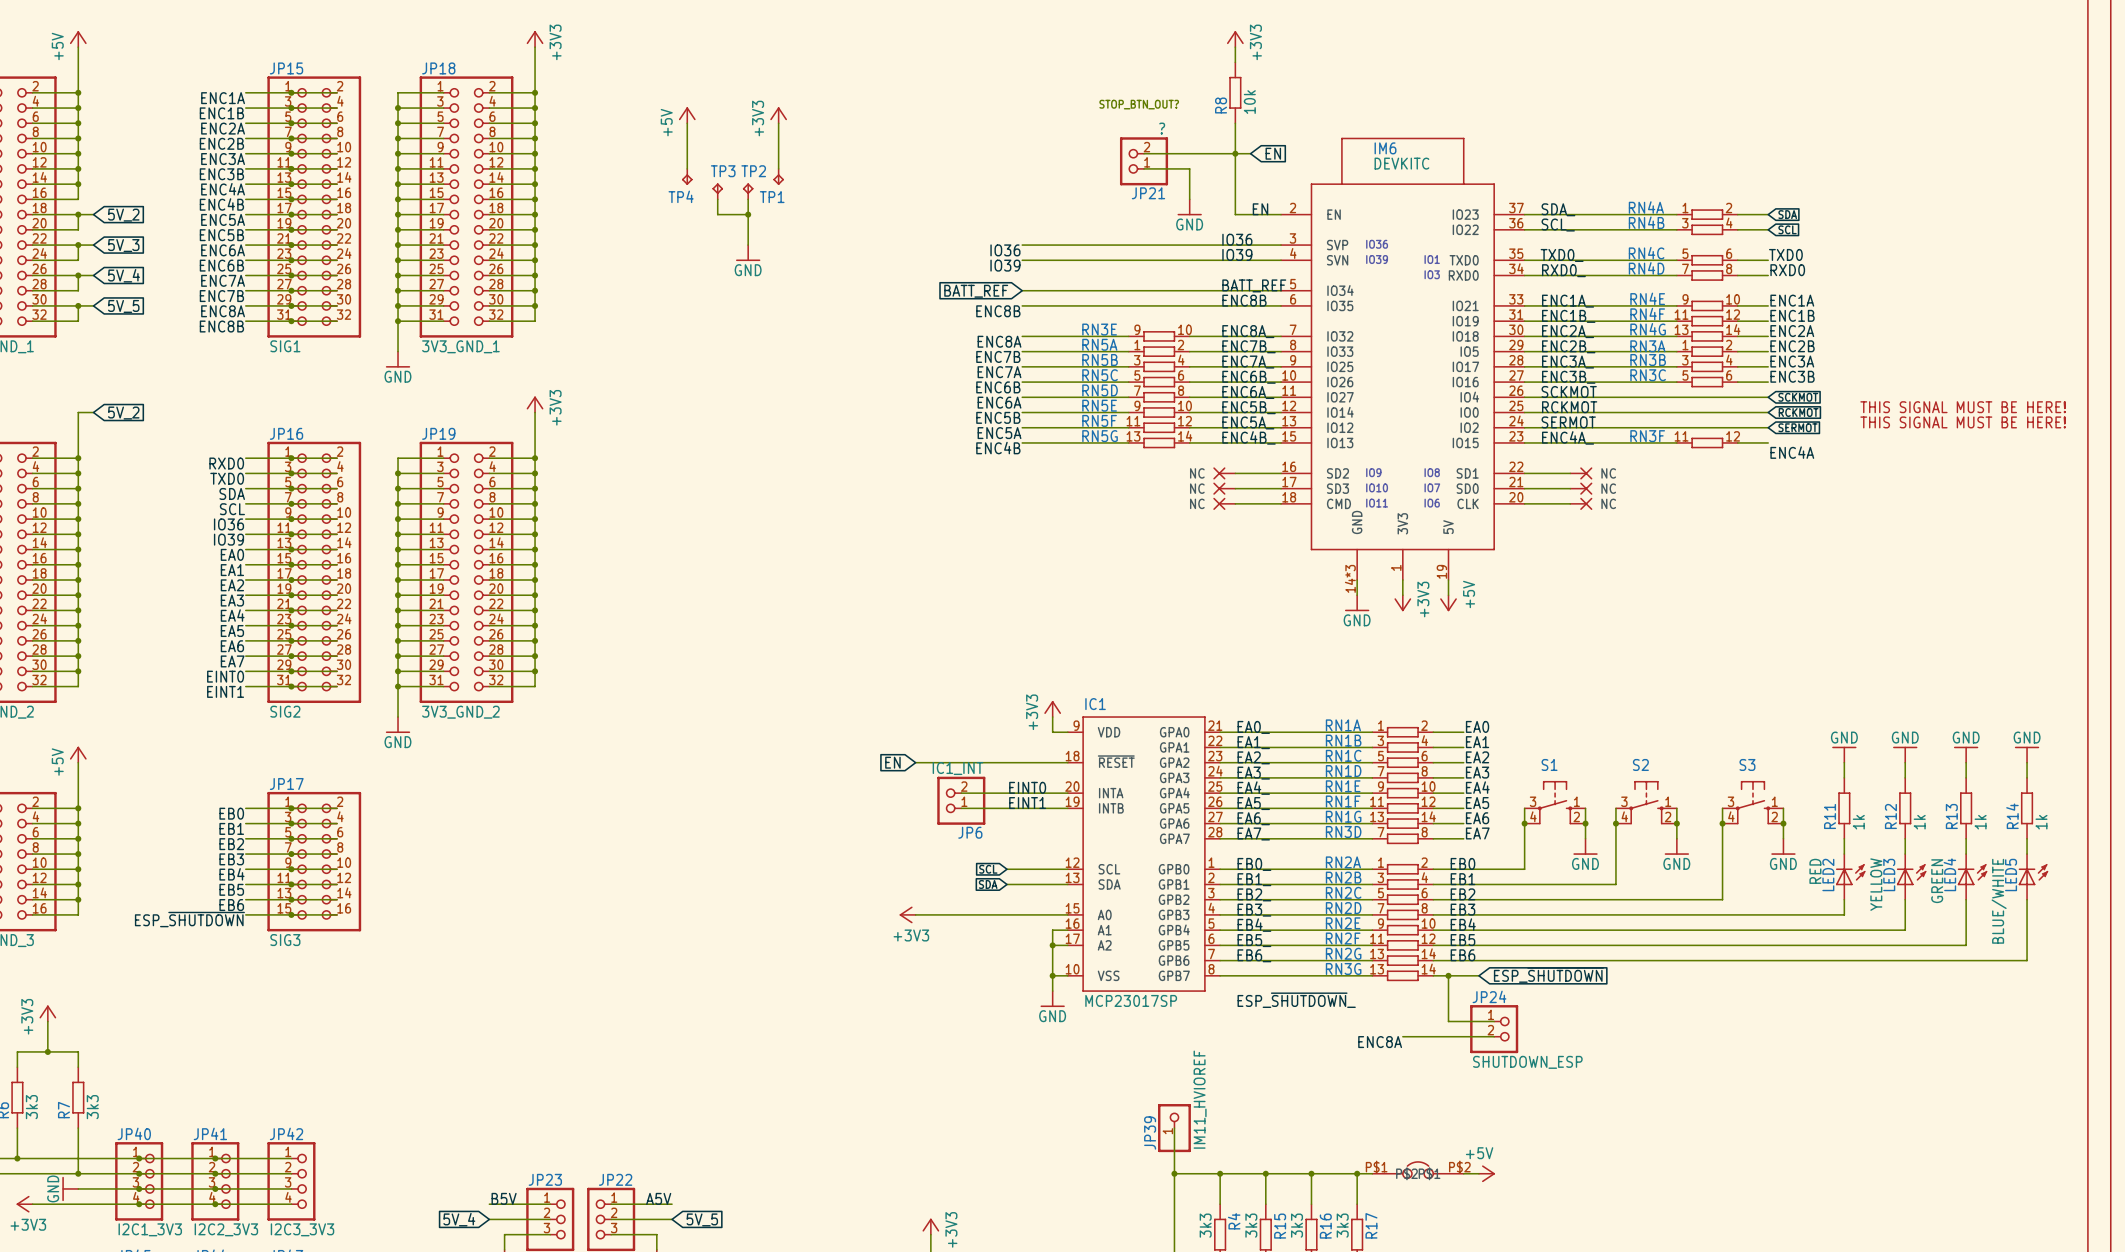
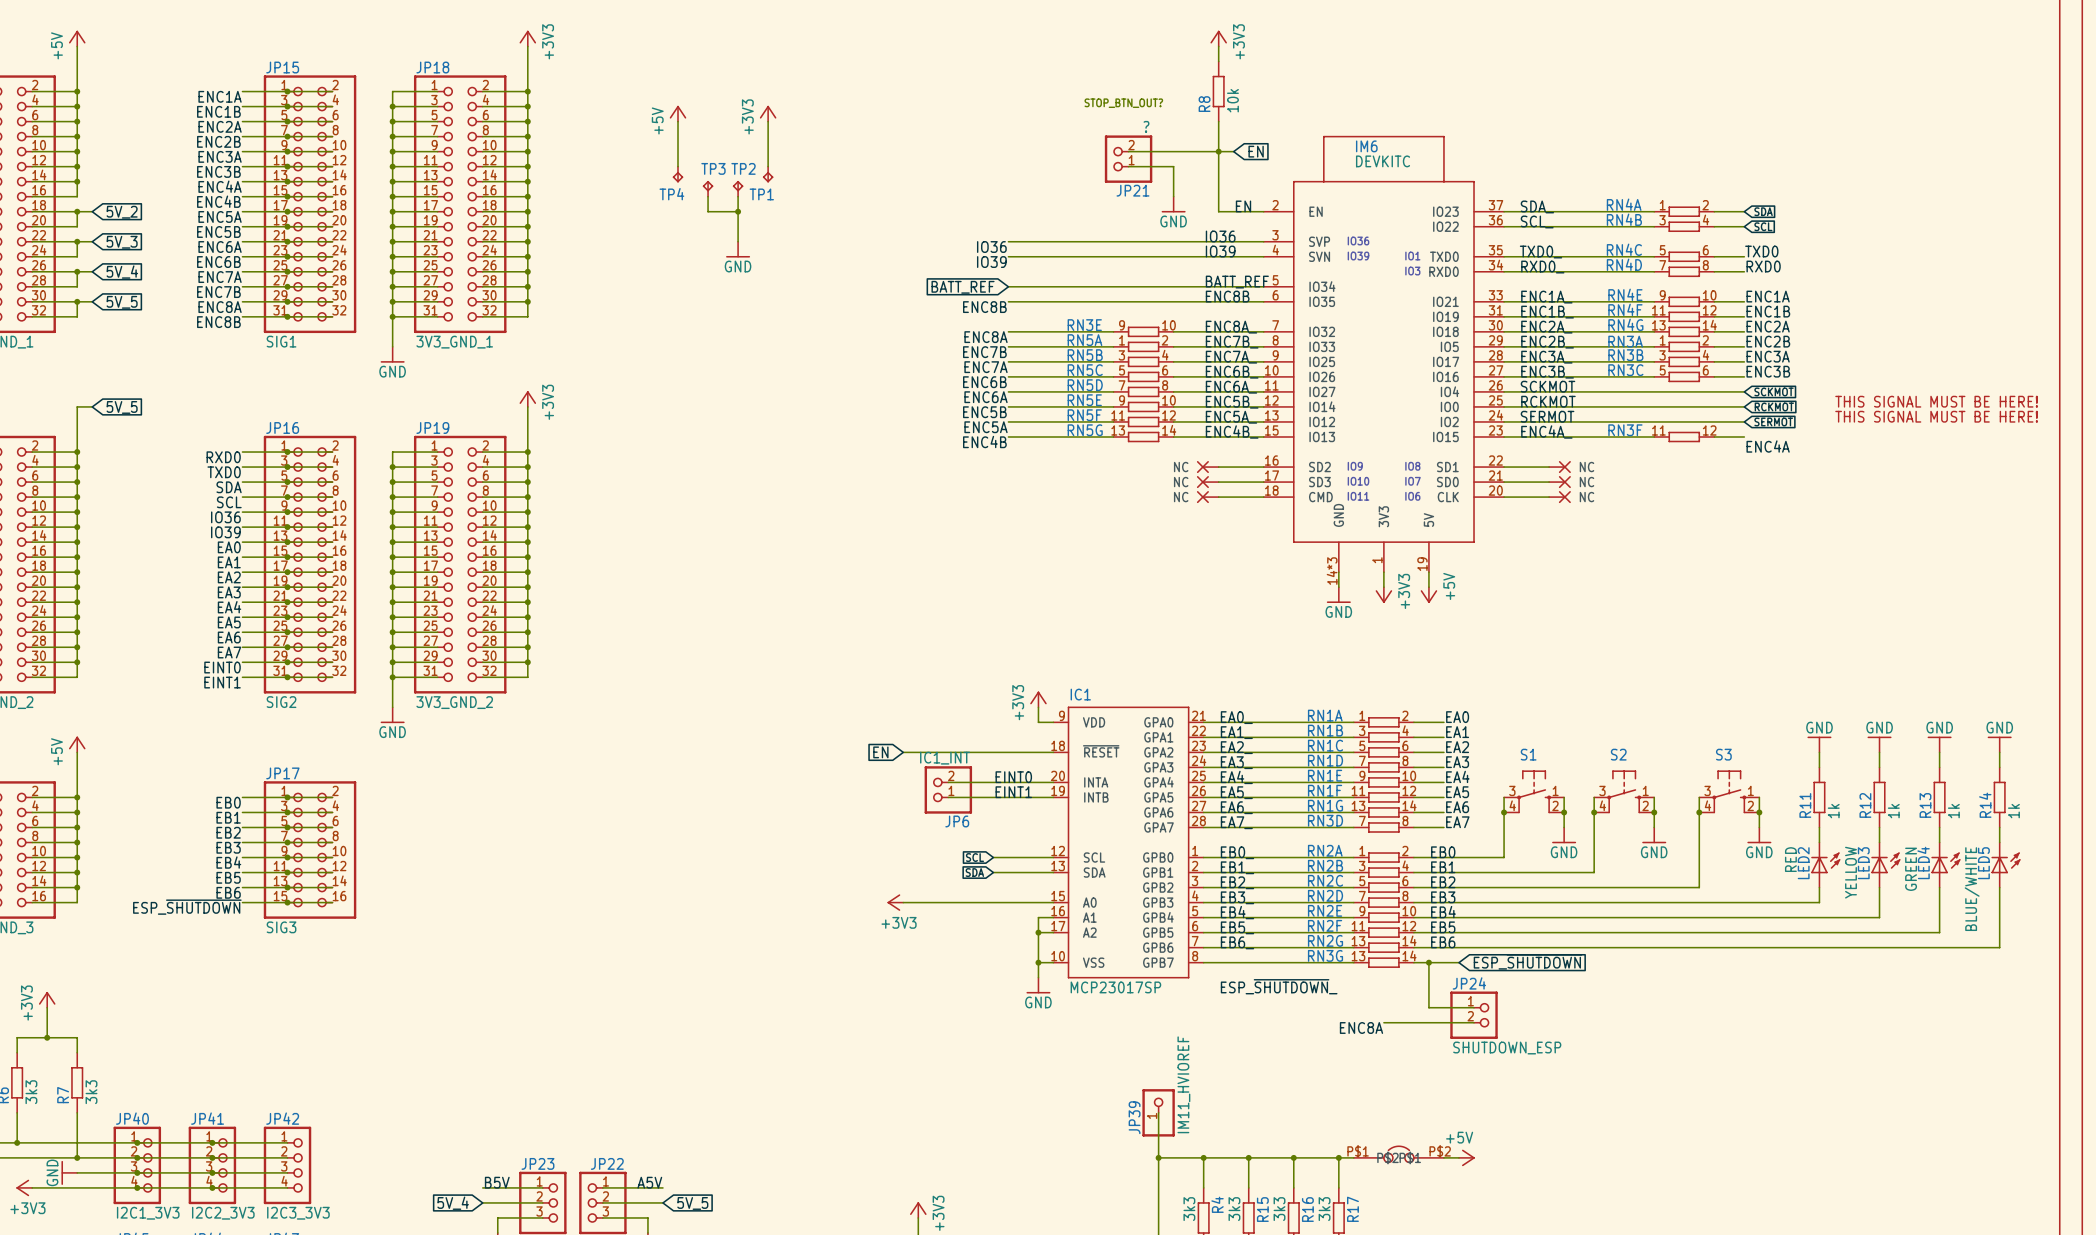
global label: 5V_2 (123, 413) -> 5V_5 (122, 407)

